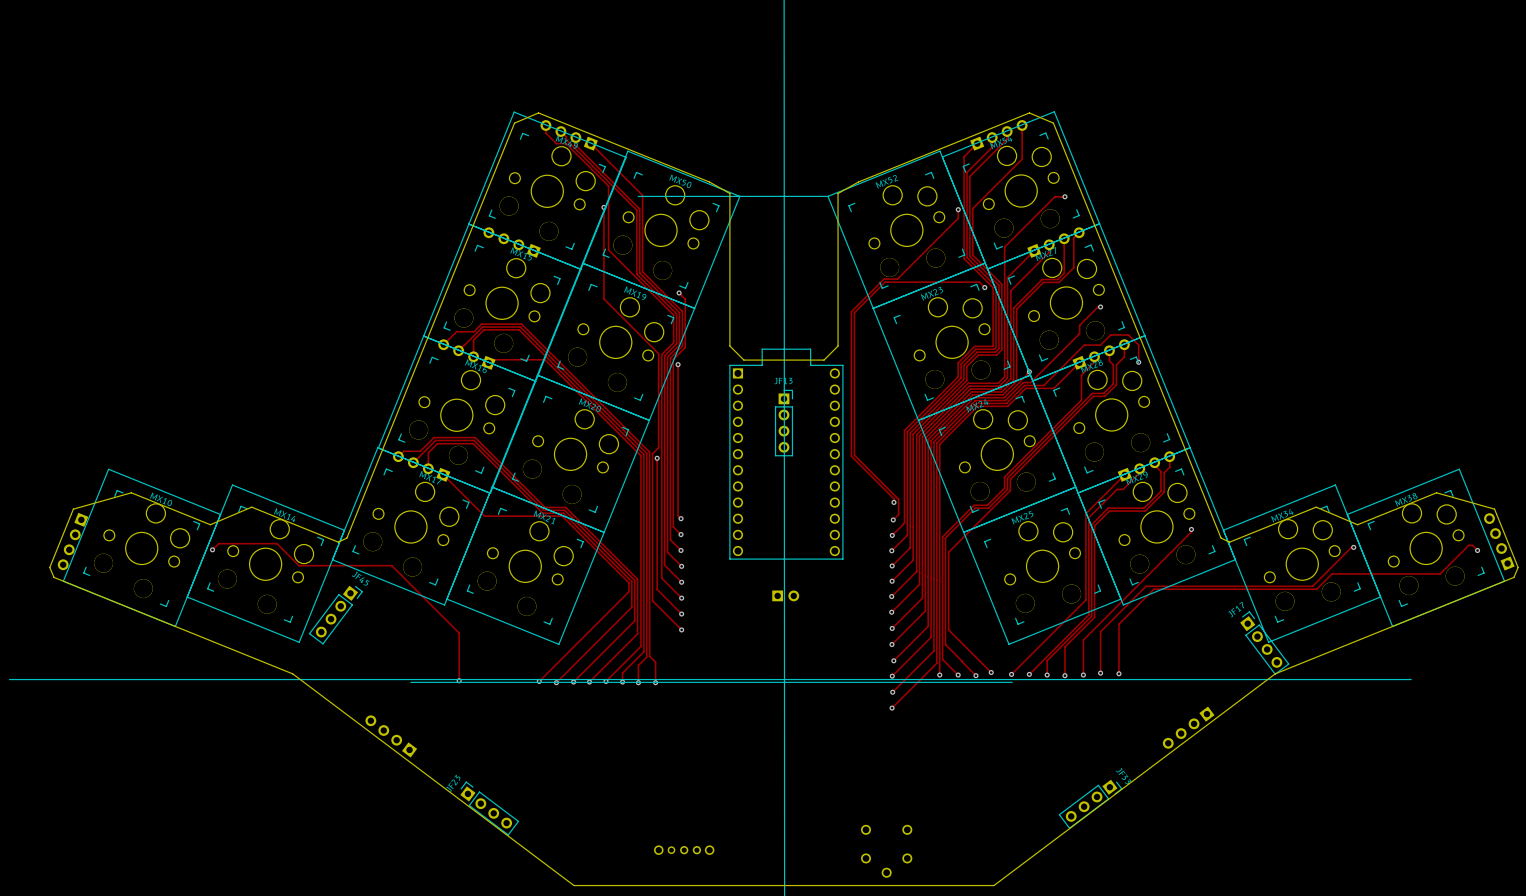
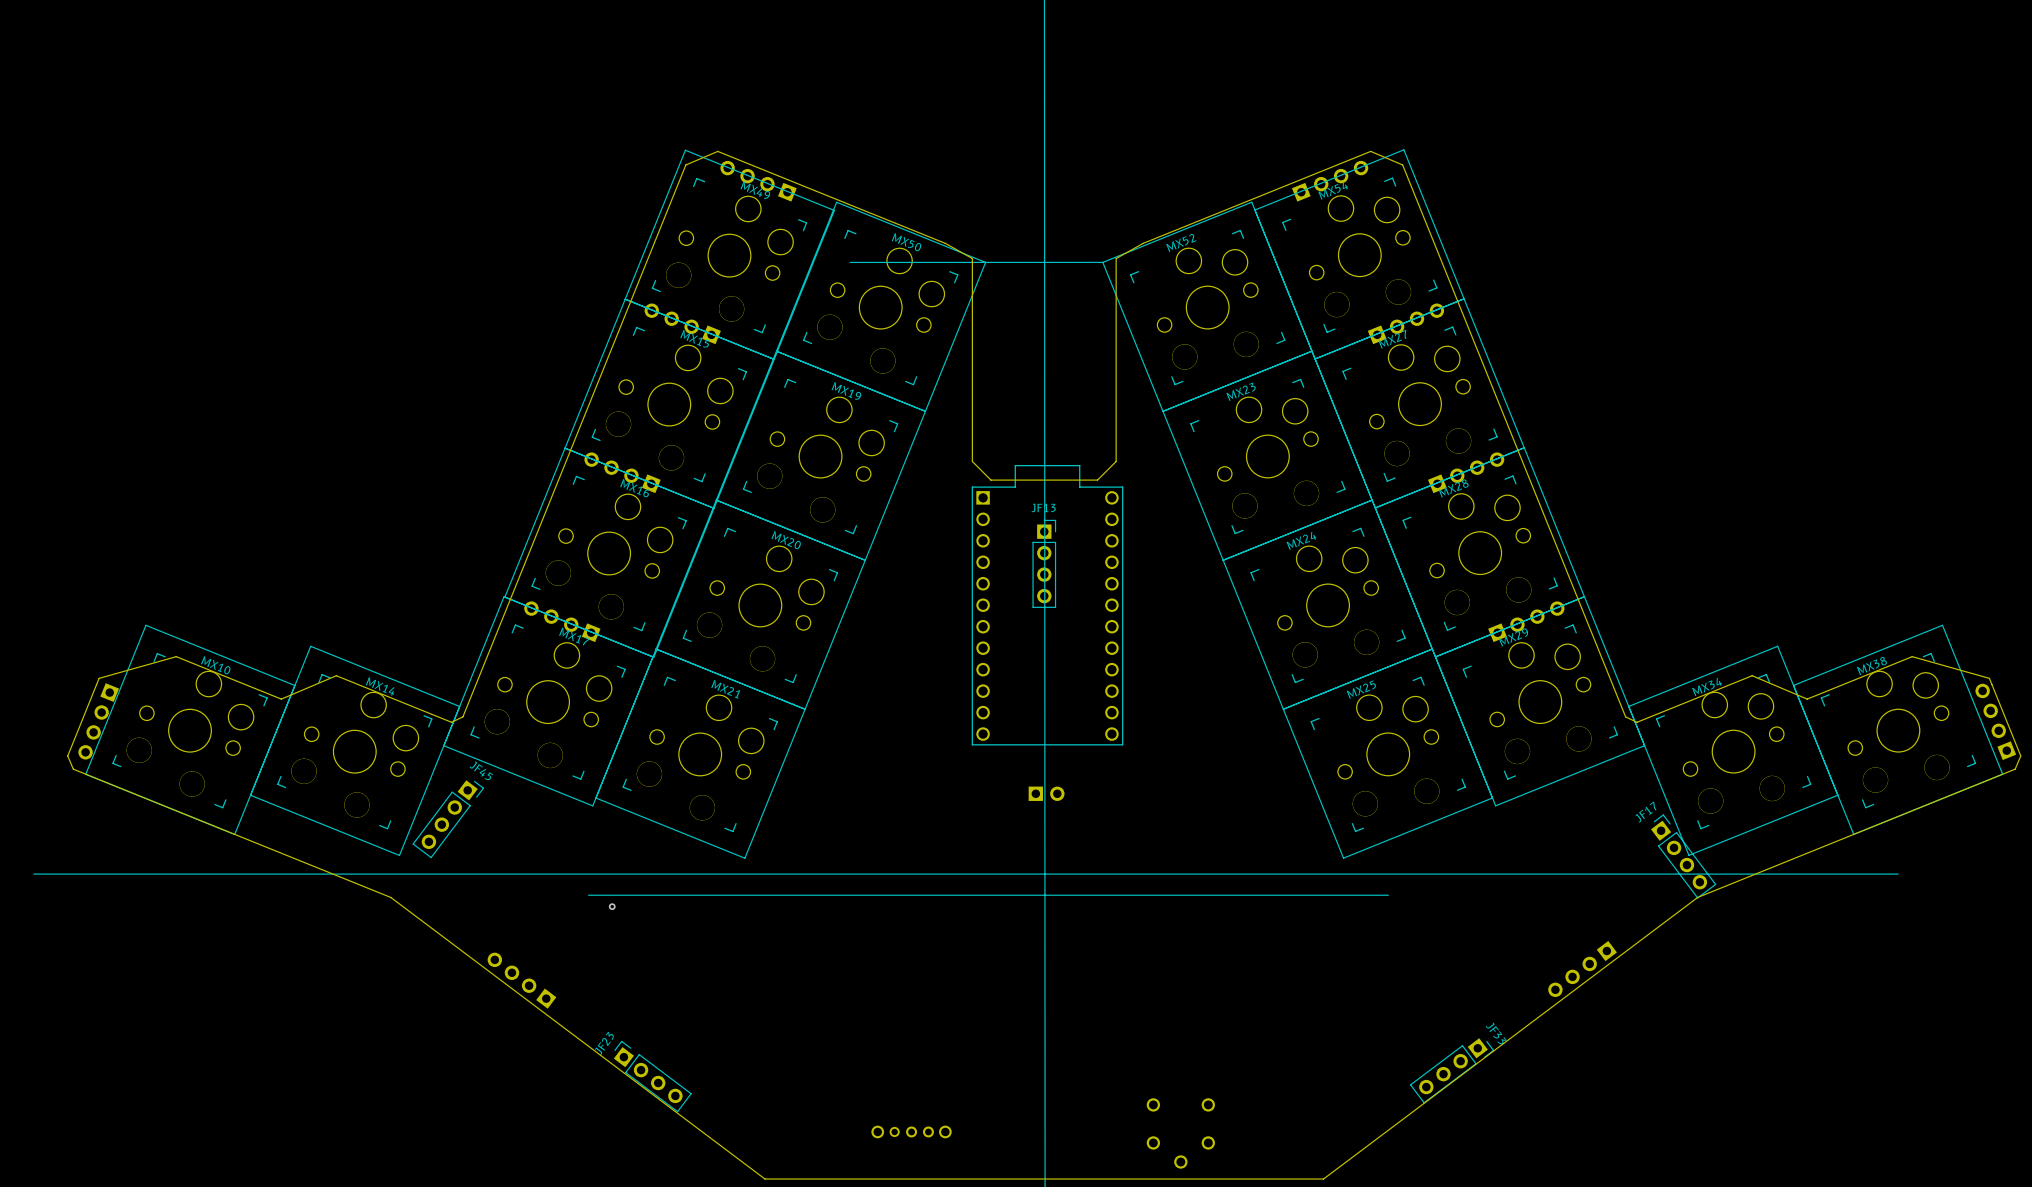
track: (545, 125) (545, 133) (556, 143) (566, 143) (608, 186) (608, 249) (673, 315) (673, 342) (661, 354) (661, 578) (681, 598) -> none
track: (1022, 125) (1022, 159) (972, 208) (972, 255) (1001, 284) (1001, 349) (996, 355) (978, 355) (966, 366) (966, 380) (913, 434) (913, 560) (892, 581) -> none
track: (560, 131) (566, 136) (566, 139) (636, 210) (636, 274) (676, 313) (676, 343) (664, 355) (664, 565) (681, 582) -> none
track: (1007, 131) (1007, 139) (969, 176) (969, 256) (998, 285) (998, 348) (995, 352) (977, 352) (963, 365) (963, 379) (910, 432) (910, 547) (892, 565) -> none
track: (575, 137) (575, 145) (639, 209) (639, 272) (679, 312) (679, 345) (667, 356) (667, 552) (681, 566) -> none
track: (992, 137) (992, 147) (967, 172) (967, 257) (996, 286) (996, 347) (994, 349) (975, 349) (961, 364) (961, 378) (907, 431) (907, 535) (891, 550) -> none
track: (590, 143) (642, 195) (642, 271) (682, 311) (682, 346) (670, 358) (670, 539) (681, 550) -> none
track: (977, 143) (964, 156) (964, 258) (993, 287) (993, 346) (974, 346) (958, 362) (958, 376) (904, 430) (904, 523) (892, 535) -> none
track: (1064, 196) (1054, 196) (1004, 247) (1004, 376) (998, 383) (968, 383) (916, 434) (916, 571) (891, 596) -> none
via: (1064, 196) -> none
track: (603, 207) (603, 298) (658, 353) (658, 447) (652, 453) (652, 600) (681, 629) -> none
via: (603, 207) -> none
track: (958, 209) (958, 218) (897, 279) (884, 279) (851, 311) (851, 456) (893, 498) (893, 502) -> none
via: (958, 209) -> none
track: (1079, 232) (1073, 238) (1073, 267) (1059, 282) (1043, 282) (1016, 309) (1016, 381) (1002, 394) (972, 394) (928, 439) (928, 626) (893, 660) -> none
track: (1064, 238) (1064, 273) (1057, 279) (1042, 279) (1013, 308) (1013, 379) (1001, 391) (971, 391) (925, 438) (925, 611) (891, 644) -> none
track: (1049, 244) (1049, 252) (1010, 290) (1010, 378) (1000, 389) (970, 389) (922, 437) (922, 598) (892, 628) -> none
track: (1034, 250) (1007, 277) (1007, 378) (999, 386) (969, 386) (919, 435) (919, 584) (891, 612) -> none
track: (984, 287) (979, 282) (885, 282) (854, 312) (854, 455) (898, 499) (898, 514) (893, 519) -> none
via: (984, 287) -> none
track: (679, 293) (685, 299) (685, 347) (673, 359) (673, 526) (681, 534) -> none
via: (679, 293) -> none
track: (1100, 306) (1098, 306) (1079, 325) (1079, 333) (1030, 382) (1023, 382) (1005, 400) (975, 400) (933, 441) (933, 650) (892, 692) -> none
via: (1100, 306) -> none
track: (443, 344) (456, 331) (473, 331) (481, 324) (521, 324) (649, 452) (649, 656) (655, 662) (655, 682) -> none
track: (1124, 344) (1124, 356) (1116, 364) (1116, 384) (1104, 396) (1093, 396) (1010, 479) (1010, 490) (948, 552) (948, 629) (991, 672) -> none
track: (458, 350) (482, 326) (520, 326) (646, 453) (646, 657) (638, 665) (638, 682) -> none
track: (1109, 350) (1109, 361) (1113, 364) (1113, 383) (1103, 393) (1092, 393) (1007, 478) (1007, 489) (988, 508) (975, 508) (945, 537) (945, 644) (975, 675) -> none
track: (473, 356) (473, 340) (483, 329) (519, 329) (643, 454) (643, 651) (622, 673) (622, 682) -> none
track: (1094, 356) (1094, 362) (1081, 375) (1081, 400) (1004, 477) (1004, 488) (987, 505) (974, 505) (942, 536) (942, 659) (958, 675) -> none
track: (488, 362) (491, 359) (544, 359) (640, 455) (640, 646) (606, 681) -> none
track: (1079, 362) (1053, 388) (1025, 388) (1007, 406) (977, 406) (939, 444) (939, 675) -> none
track: (1138, 362) (1138, 345) (1128, 334) (1110, 334) (1100, 345) (1084, 345) (1043, 385) (1024, 385) (1006, 403) (976, 403) (936, 443) (936, 663) (892, 708) -> none
via: (1138, 362) -> none
track: (678, 364) (678, 515) (681, 518) -> none
via: (678, 364) -> none
track: (1029, 371) (1004, 397) (974, 397) (931, 440) (931, 637) (892, 676) -> none
via: (1029, 371) -> none
track: (398, 456) (403, 451) (420, 451) (434, 437) (475, 437) (545, 507) (565, 507) (637, 579) (637, 633) (589, 682) -> none
track: (1169, 456) (1169, 467) (1164, 472) (1164, 492) (1145, 511) (1109, 511) (1094, 525) (1094, 617) (1064, 646) (1064, 675) -> none
track: (657, 458) (657, 589) (681, 614) -> none
via: (657, 458) -> none
track: (413, 462) (435, 440) (474, 440) (543, 510) (564, 510) (634, 580) (634, 620) (573, 682) -> none
track: (1154, 462) (1154, 465) (1160, 471) (1160, 491) (1144, 508) (1108, 508) (1091, 524) (1091, 616) (1047, 660) (1047, 675) -> none
track: (428, 468) (428, 452) (437, 443) (473, 443) (542, 513) (563, 513) (631, 581) (631, 607) (556, 682) -> none
track: (1139, 468) (1137, 468) (1139, 472) (1123, 489) (1117, 489) (1088, 517) (1088, 614) (1029, 674) -> none
track: (443, 474) (484, 516) (562, 516) (628, 582) (628, 591) (539, 681) -> none
track: (1124, 474) (1085, 513) (1085, 600) (1011, 674) -> none
via: (893, 502) -> none
via: (681, 518) -> none
via: (893, 519) -> none
track: (1191, 529) (1191, 531) (1083, 640) (1083, 675) -> none
via: (1191, 529) -> none
via: (681, 534) -> none
via: (892, 535) -> none
track: (1353, 547) (1312, 586) (1146, 586) (1100, 631) (1100, 673) -> none
via: (1353, 547) -> none
track: (212, 549) (218, 543) (276, 543) (298, 565) (391, 565) (459, 633) (459, 680) -> none
via: (212, 549) -> none
via: (681, 550) -> none
via: (891, 550) -> none
track: (1477, 550) (1472, 545) (1468, 545) (1440, 573) (1332, 573) (1316, 589) (1153, 589) (1118, 624) (1118, 673) -> none
via: (1477, 550) -> none
via: (892, 565) -> none
via: (681, 566) -> none
via: (892, 581) -> none
via: (681, 582) -> none
via: (891, 596) -> none
via: (681, 598) -> none
via: (891, 612) -> none
via: (681, 614) -> none
via: (892, 628) -> none
via: (681, 629) -> none
via: (891, 644) -> none
via: (893, 660) -> none
via: (991, 672) -> none
via: (1100, 673) -> none
via: (1118, 673) -> none
via: (1011, 674) -> none
via: (1029, 674) -> none
via: (939, 675) -> none
via: (958, 675) -> none
via: (975, 675) -> none
via: (1047, 675) -> none
via: (1064, 675) -> none
via: (1083, 675) -> none
via: (892, 676) -> none
line: (9, 679) (1411, 679) -> (33, 874) (1898, 874)
via: (539, 681) -> none
via: (606, 681) -> none
line: (410, 682) (1012, 682) -> (588, 895) (1388, 895)
via: (556, 682) -> none
via: (573, 682) -> none
via: (589, 682) -> none
via: (622, 682) -> none
via: (638, 682) -> none
via: (655, 682) -> none
via: (892, 692) -> none
via: (892, 708) -> none

